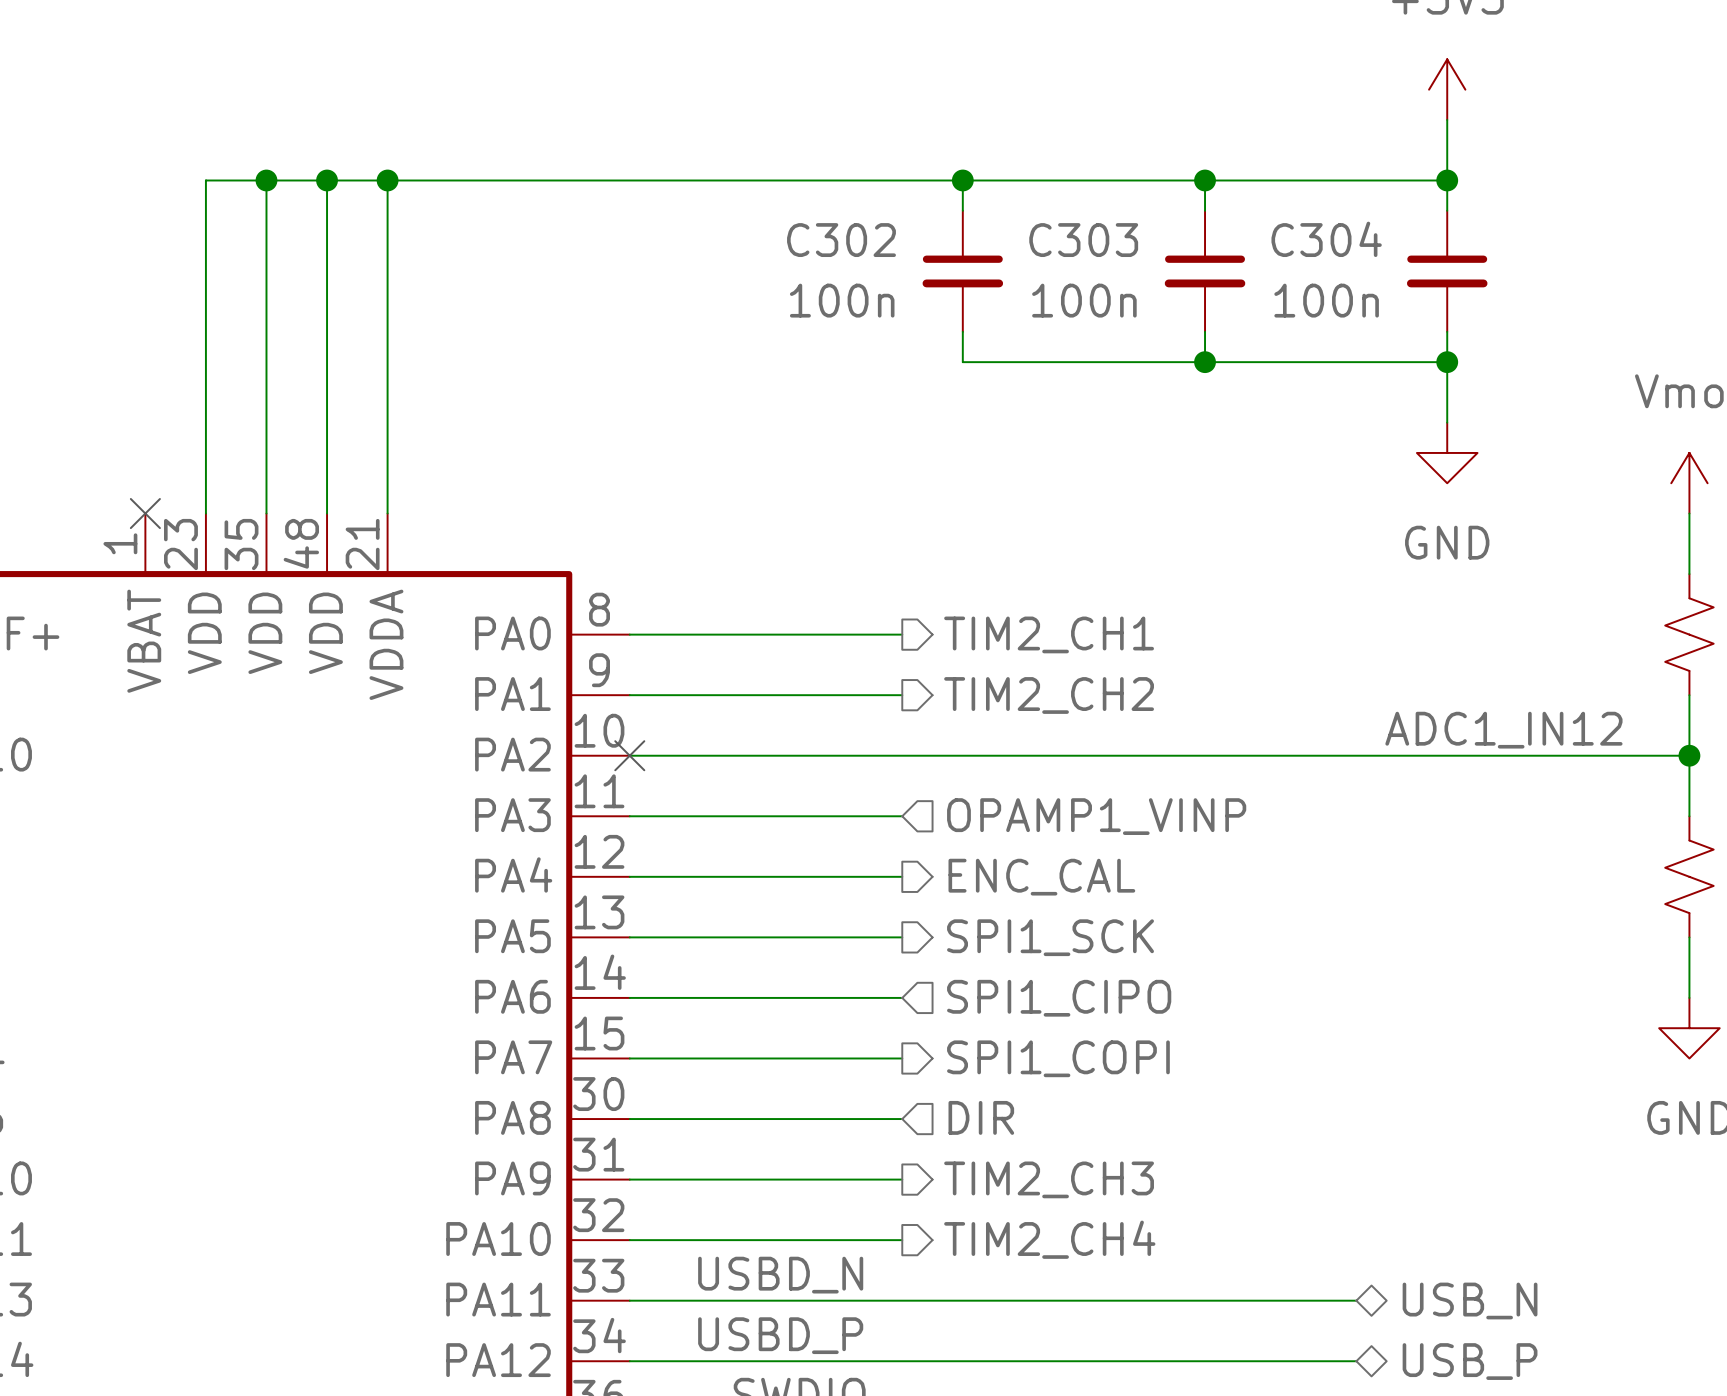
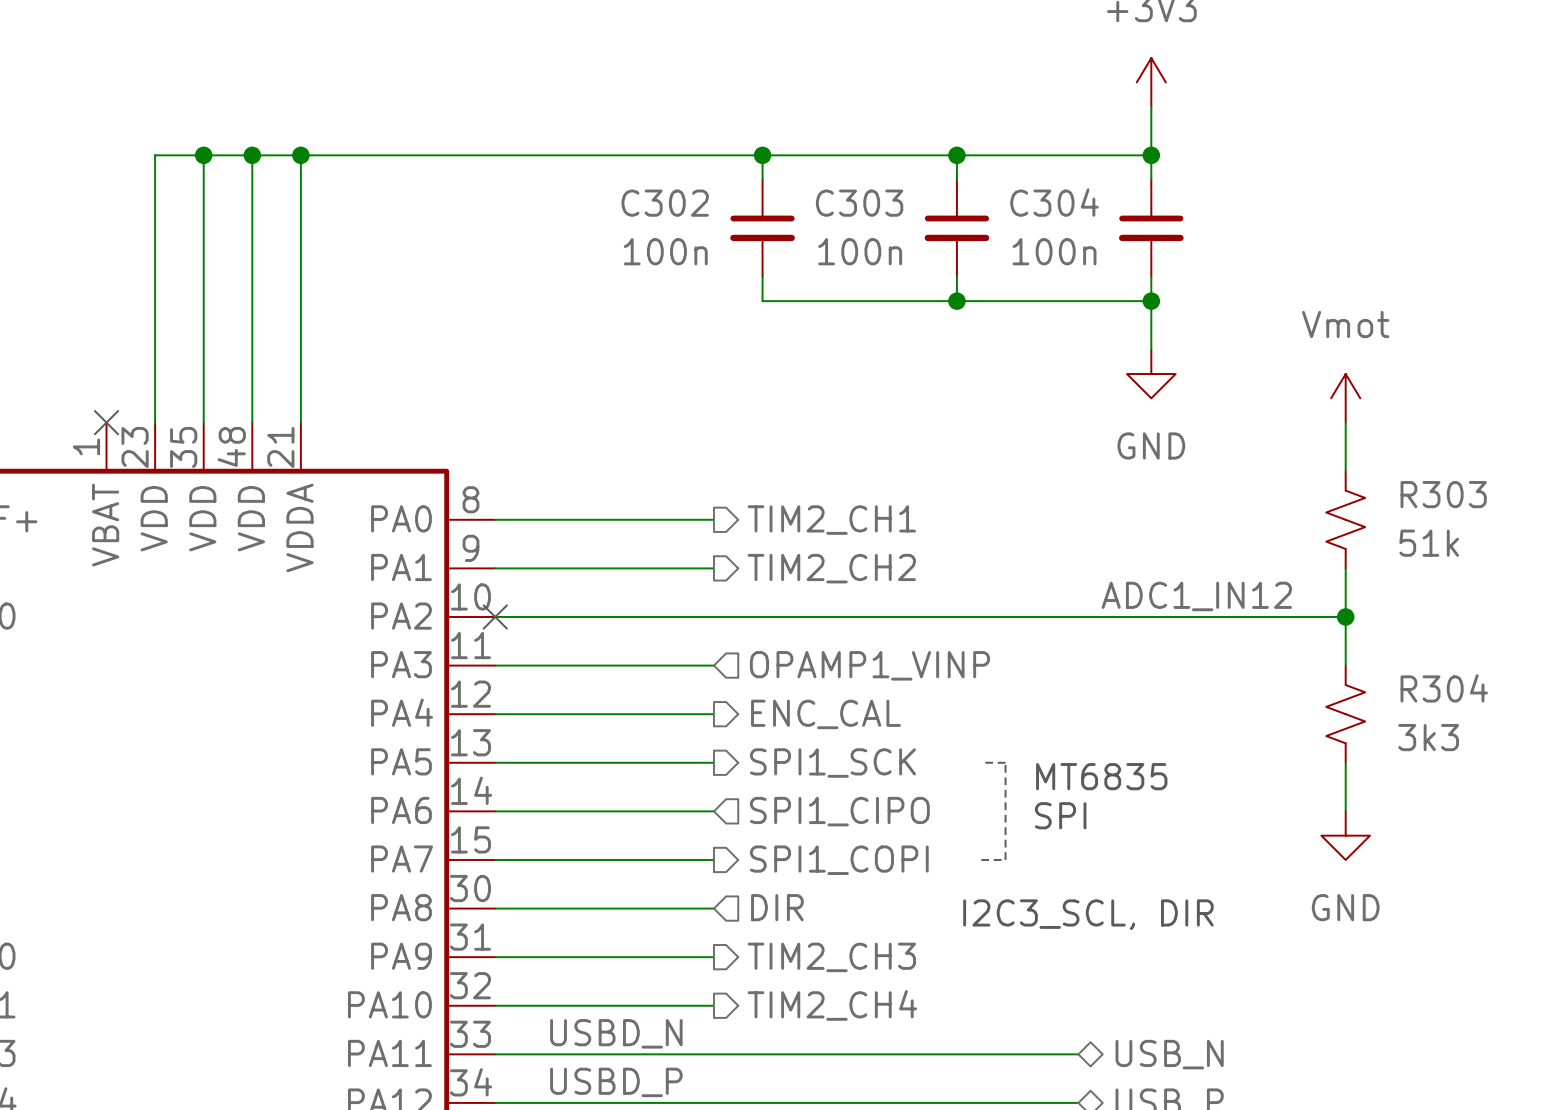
line: none -> (981, 762) (1005, 762) (1005, 859) (981, 859)
text: none -> MT6835 (1101, 776)
text: none -> SPI (1060, 815)
text: none -> I2C3_SCL, DIR (1088, 914)

